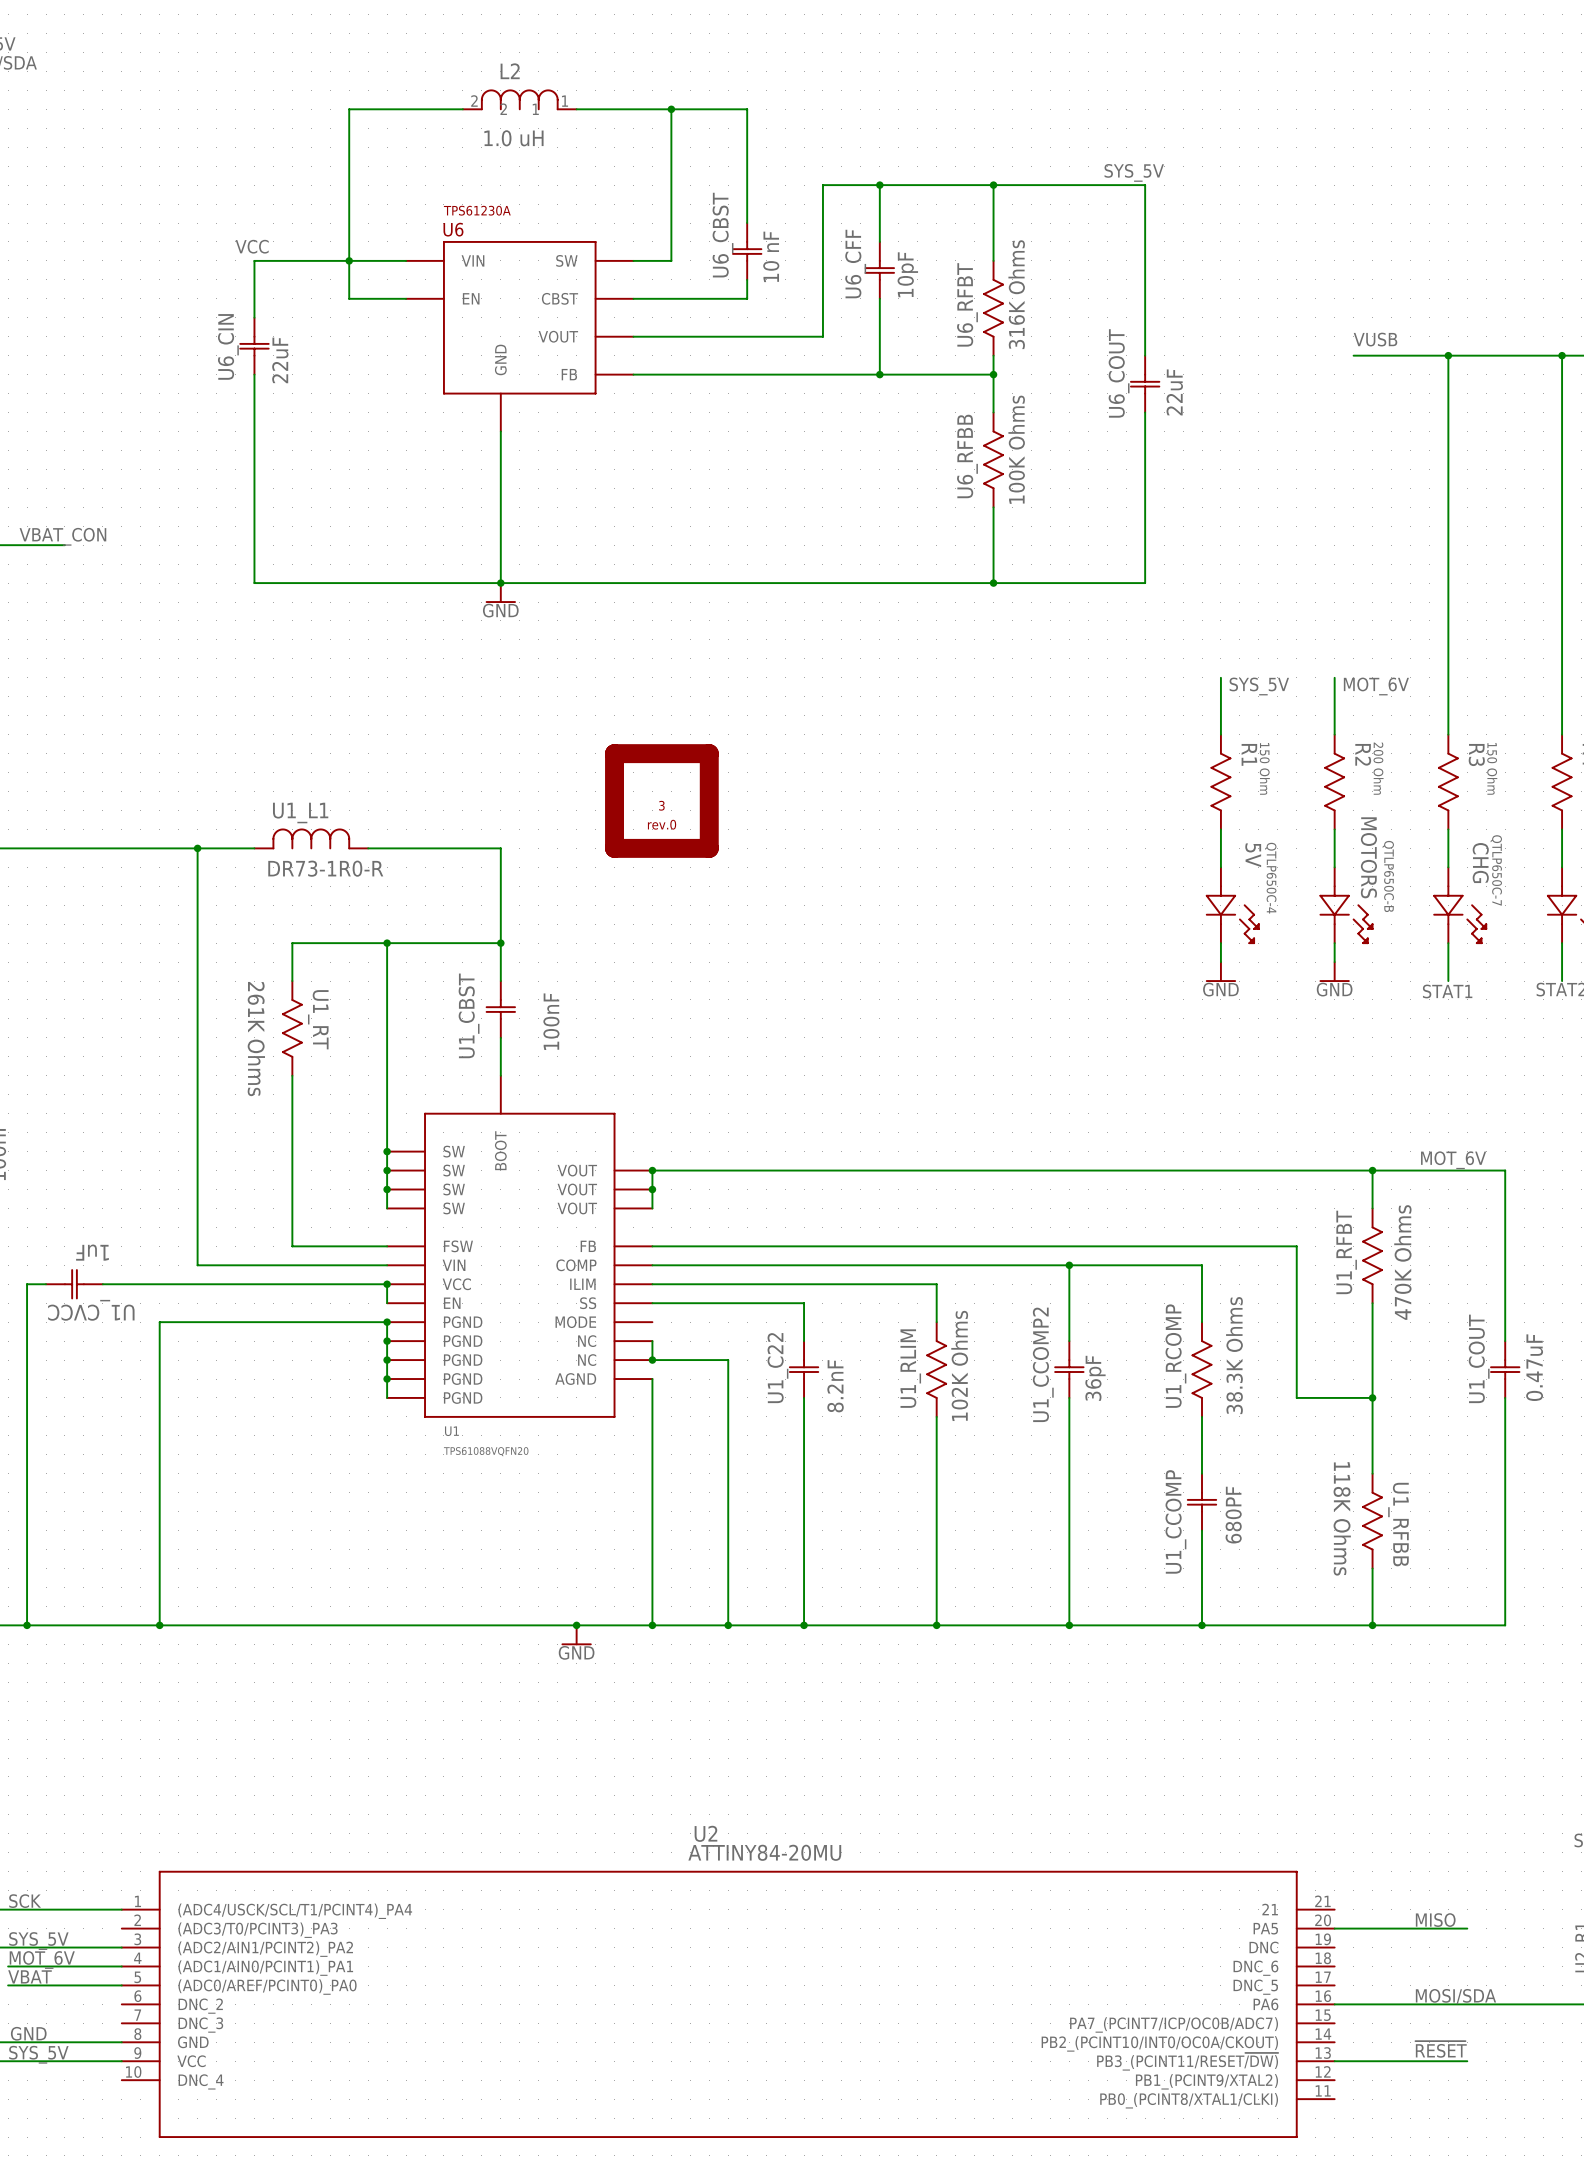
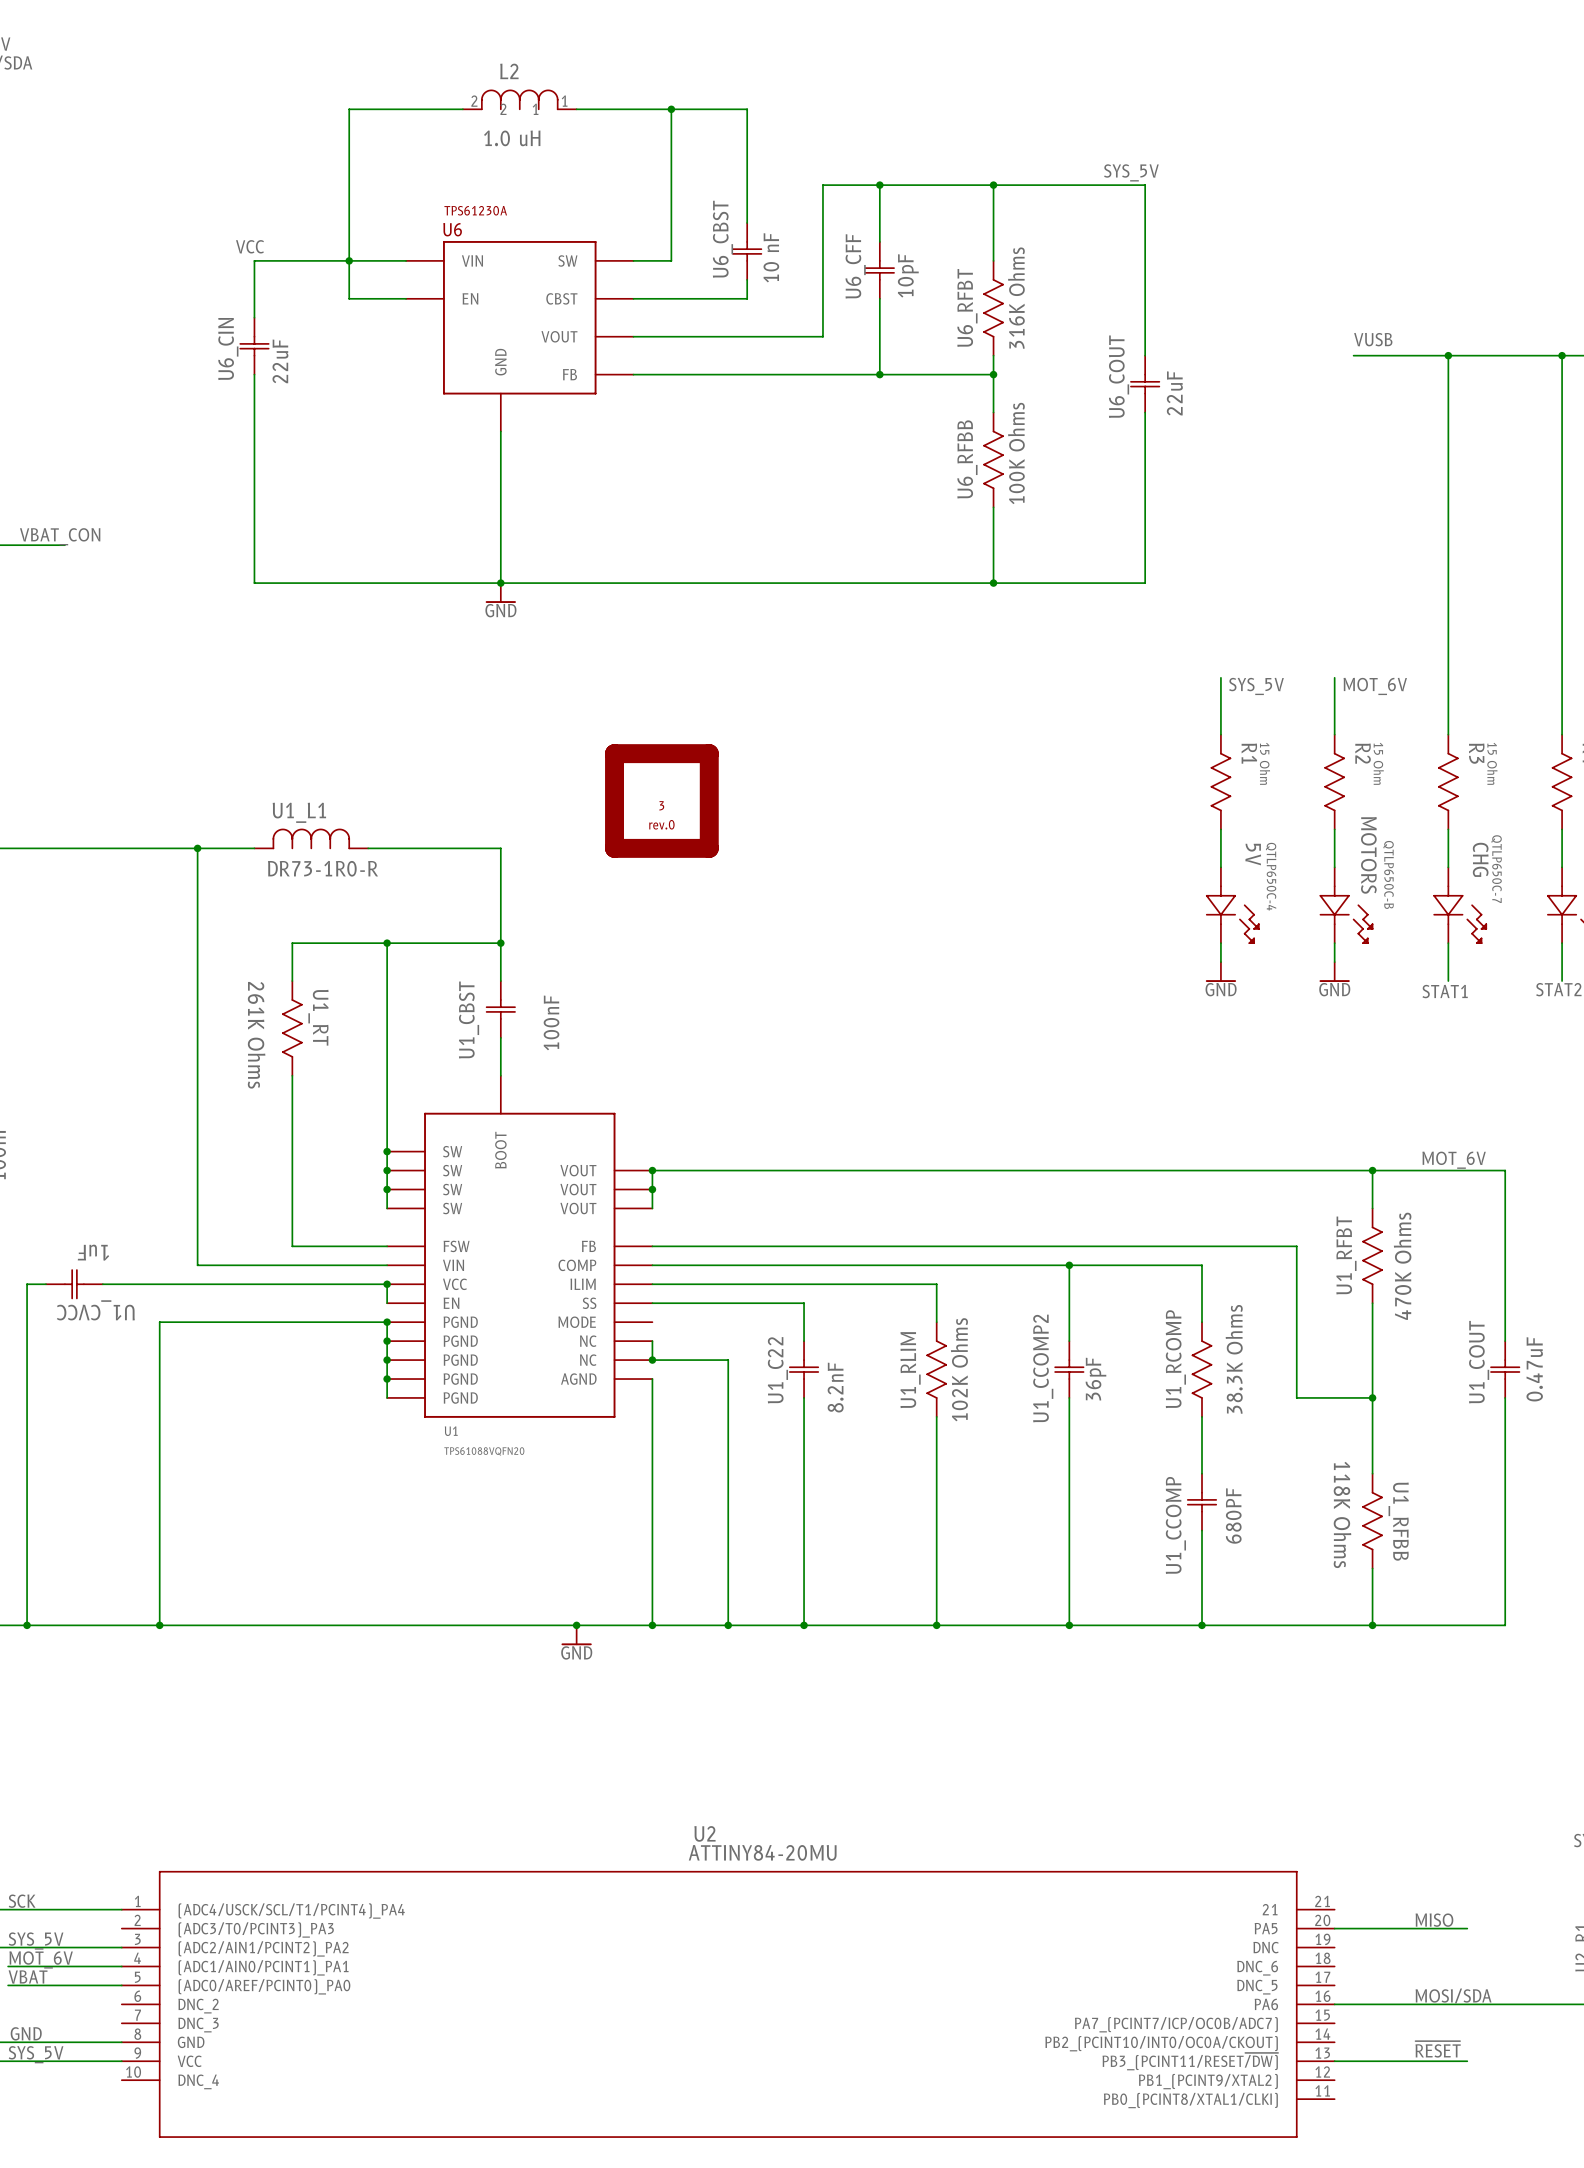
R1 value: 150 Ohm (1264, 768) -> 15 Ohm (1264, 763)
R2 value: 200 Ohm (1378, 768) -> 15 Ohm (1378, 763)
R3 value: 150 Ohm (1492, 768) -> 15 Ohm (1492, 763)

